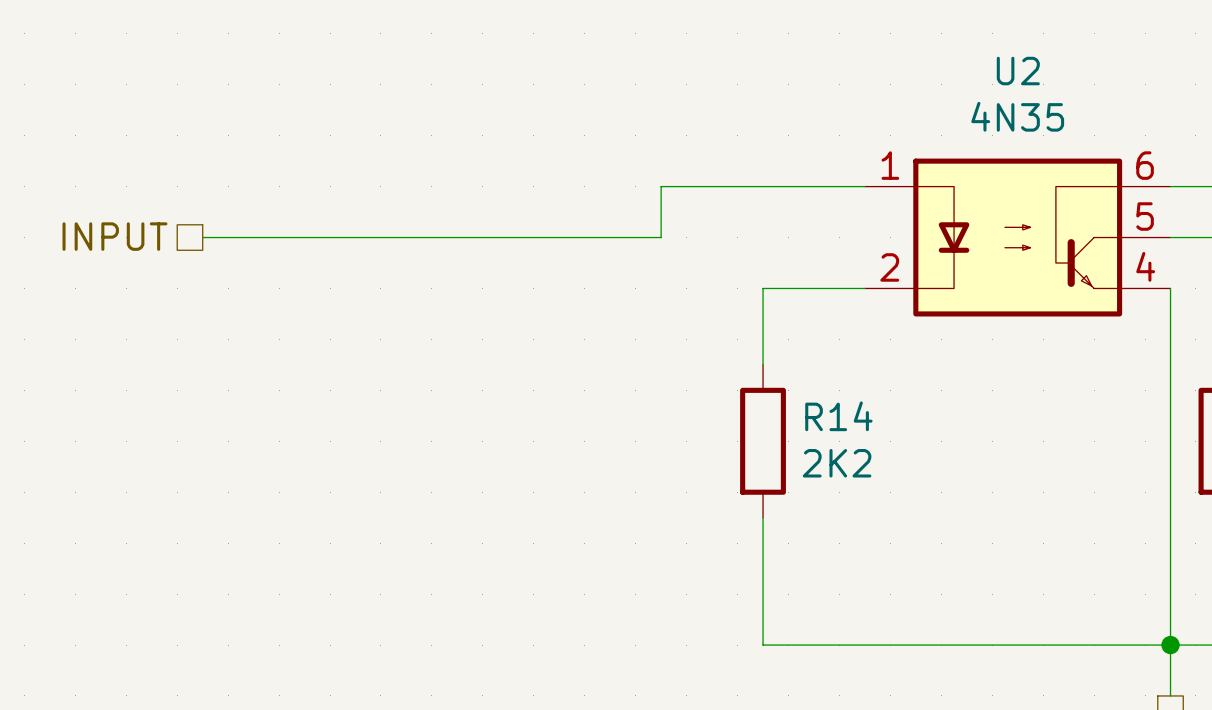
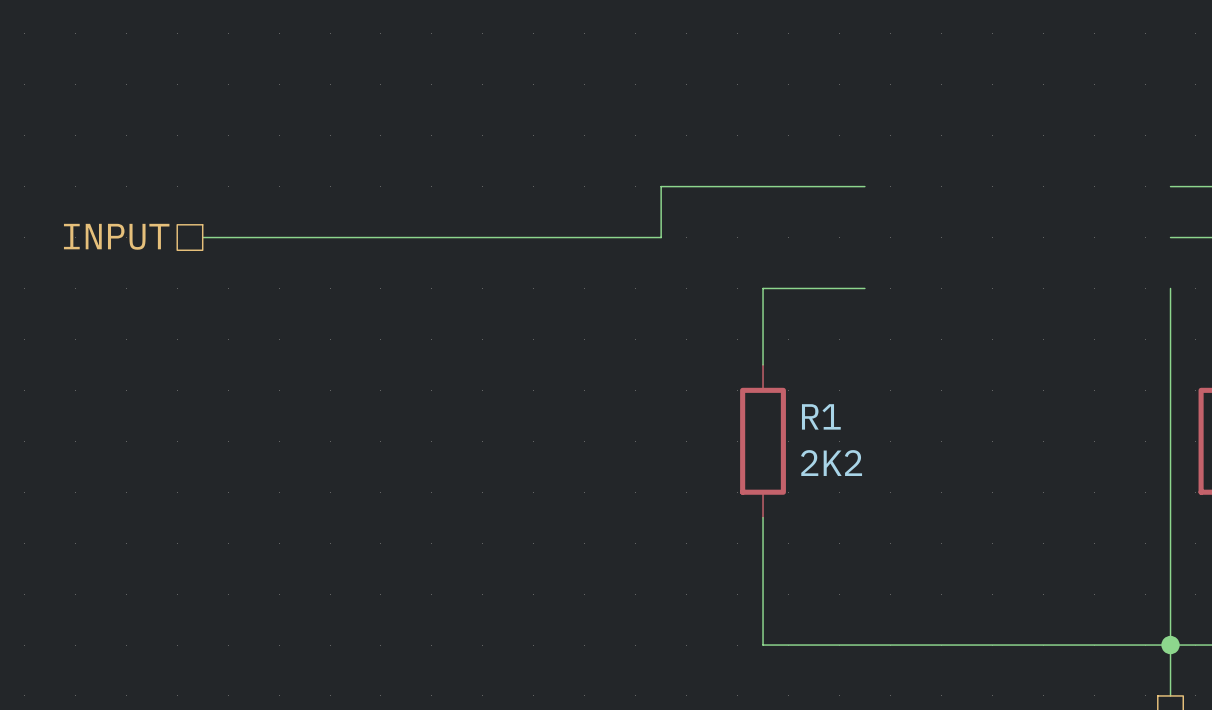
U2: 4N35 (1017, 237) -> none
R14 name: R14 (838, 416) -> R1 (821, 416)

